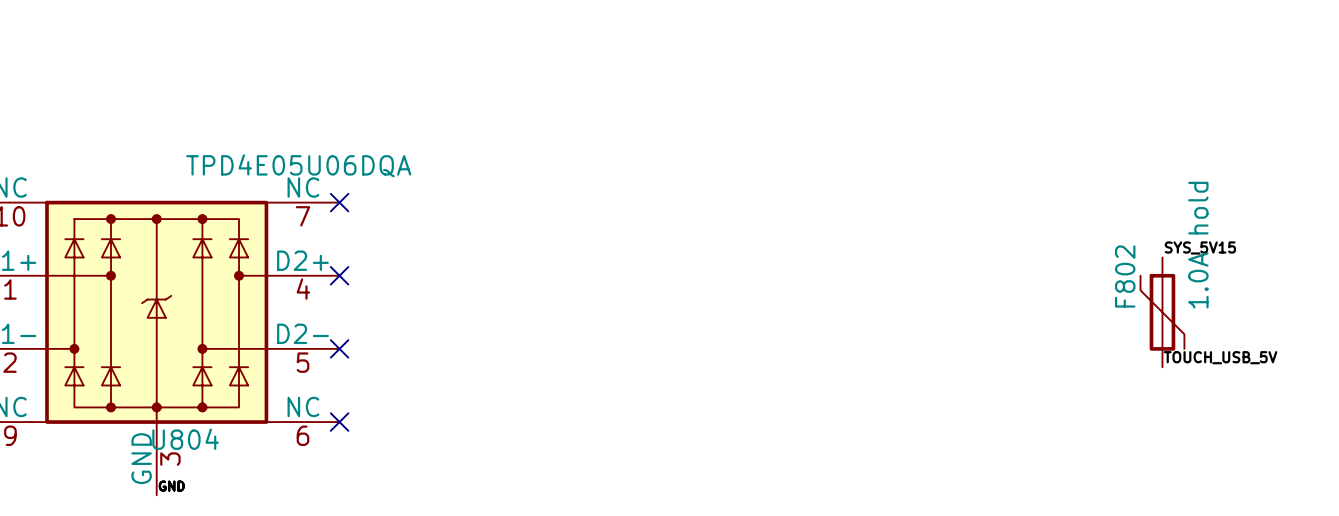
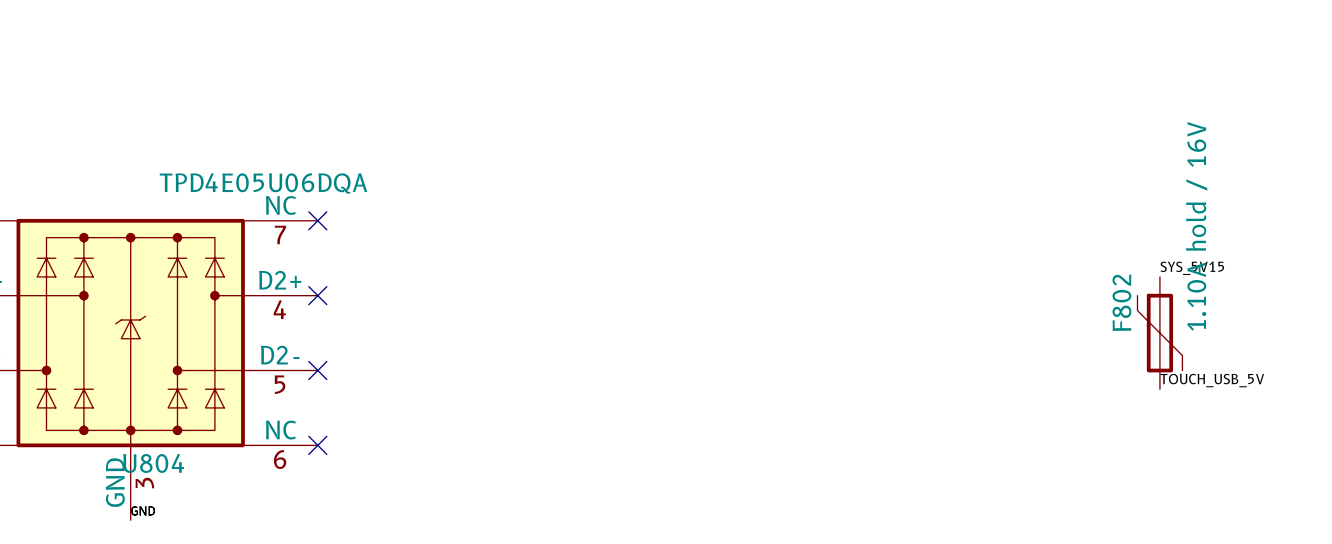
F802 value: 1.0A hold (1198, 245) -> 1.10A hold / 16V (1196, 226)

